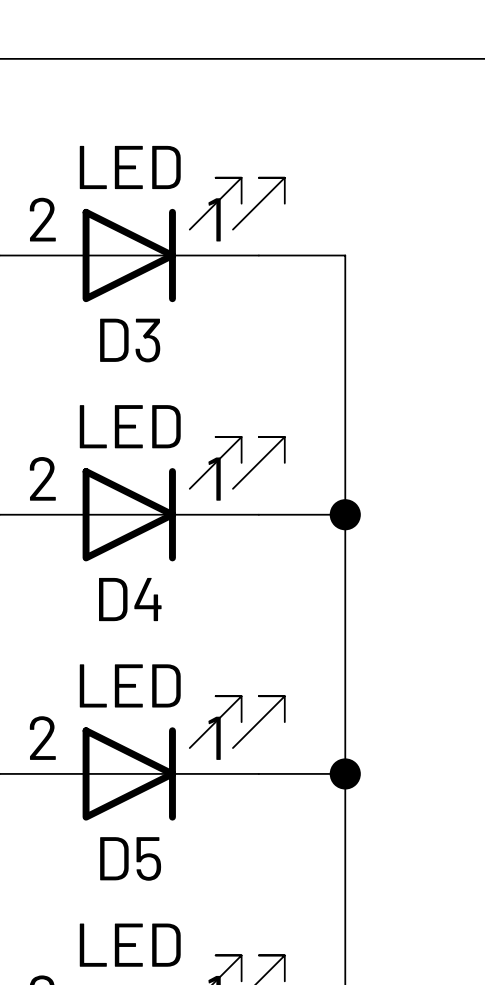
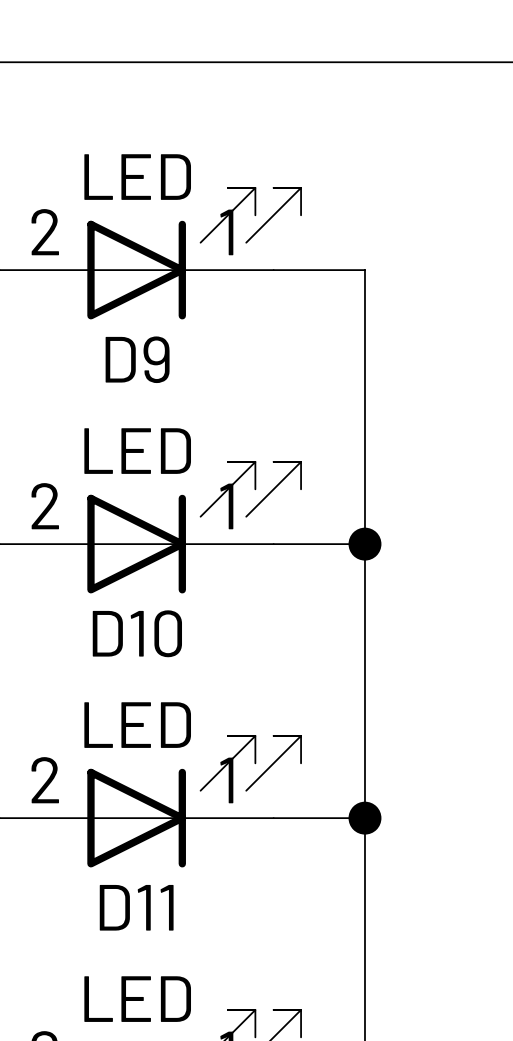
D3 name: D3 (130, 340) -> D9 (137, 359)
D4 name: D4 (130, 599) -> D10 (137, 633)
D5 name: D5 (130, 858) -> D11 (136, 907)

